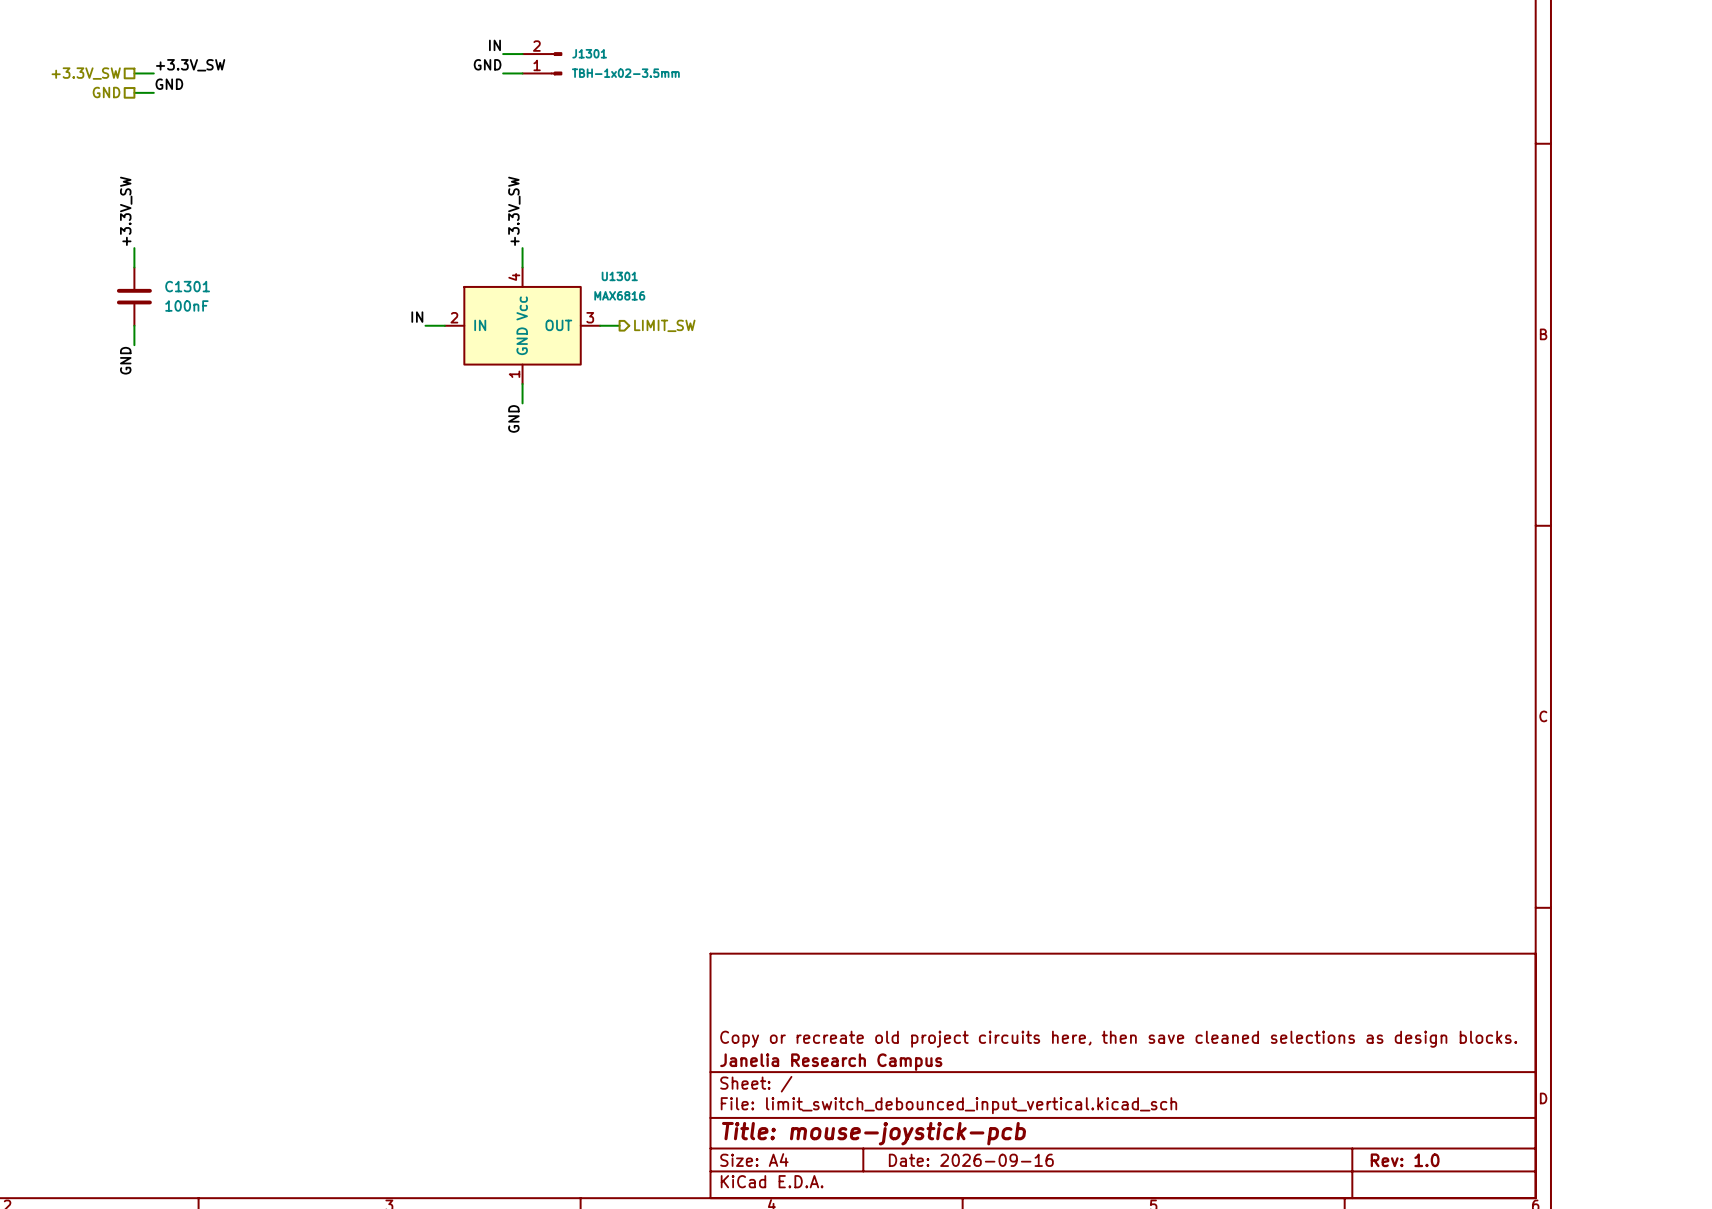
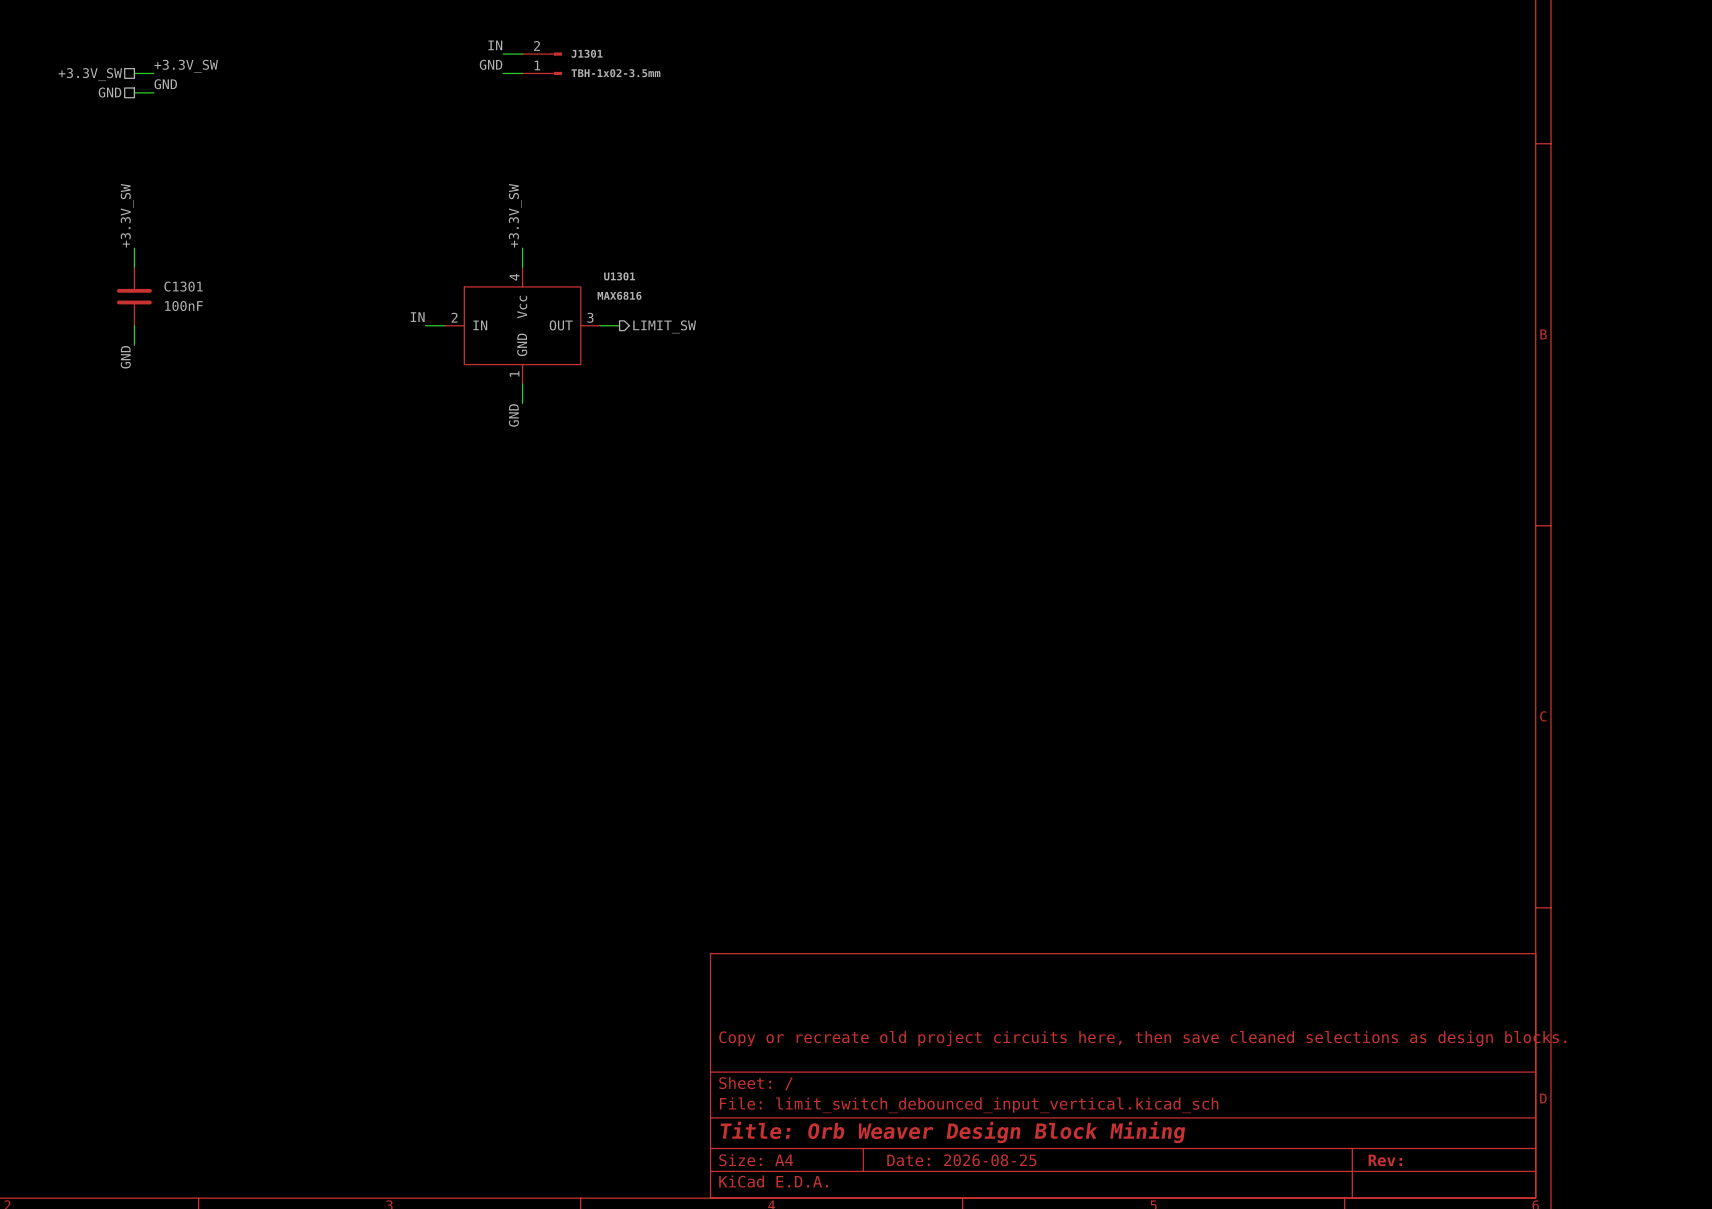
title block: Janelia Research Campus (831, 1062) -> none
title block: Title: mouse-joystick-pcb (874, 1133) -> Title: Orb Weaver Design Block Mining (952, 1132)
title block: Date: 2026-09-16 (971, 1160) -> Date: 2026-08-25 (961, 1160)
title block: Rev: 1.0 (1405, 1160) -> Rev: (1385, 1160)

